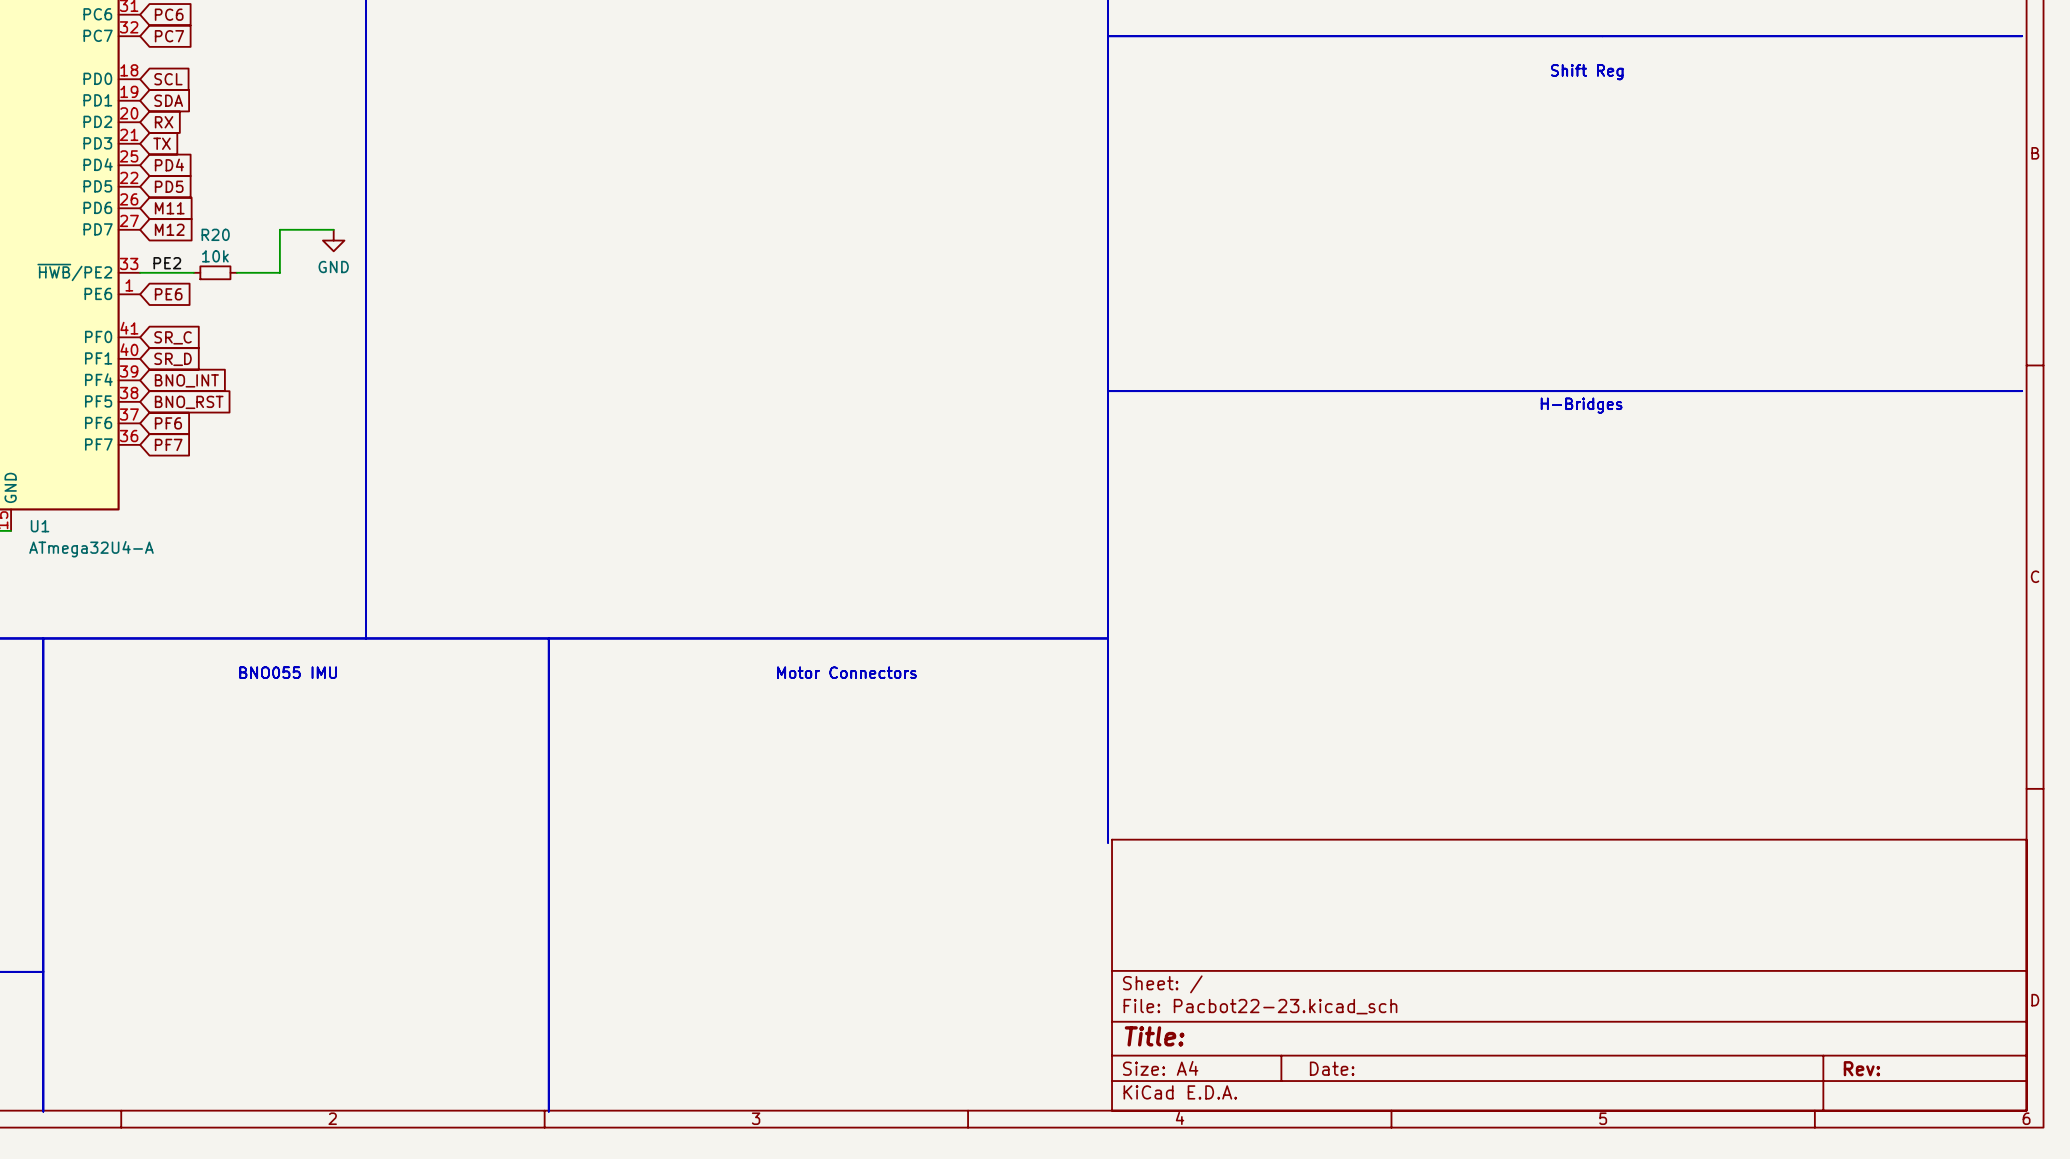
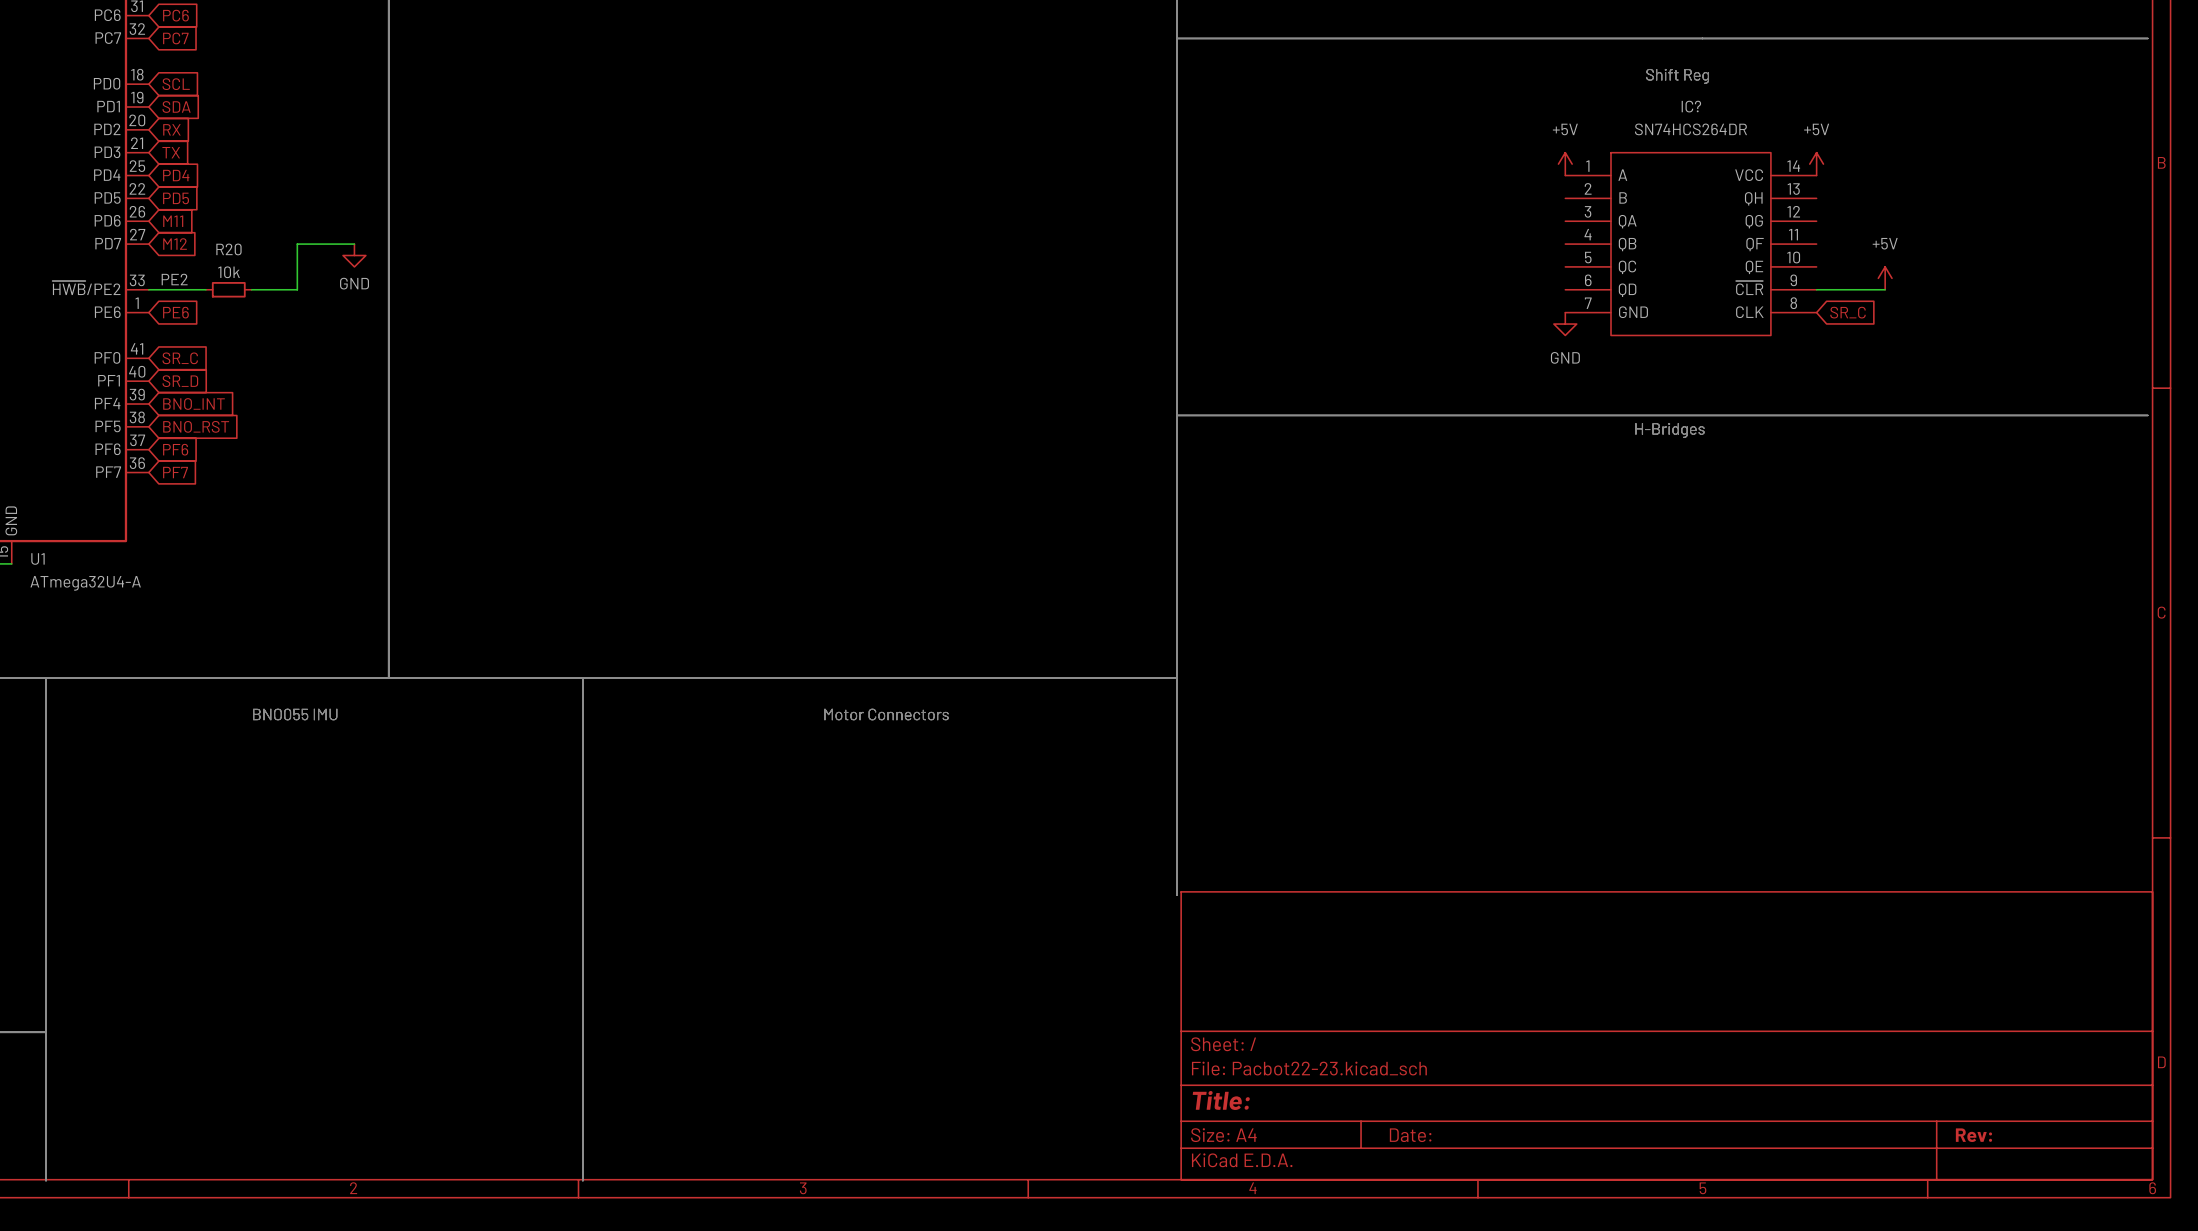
power symbol: none -> +5V (1565, 164)
power symbol: none -> +5V (1816, 164)
IC?: none -> SN74HCS264DR (1690, 244)
power symbol: none -> +5V (1885, 278)
wire: none -> (1816, 289) (1885, 289)
global label: none -> SR_C (1848, 312)
power symbol: none -> GND (1565, 324)

